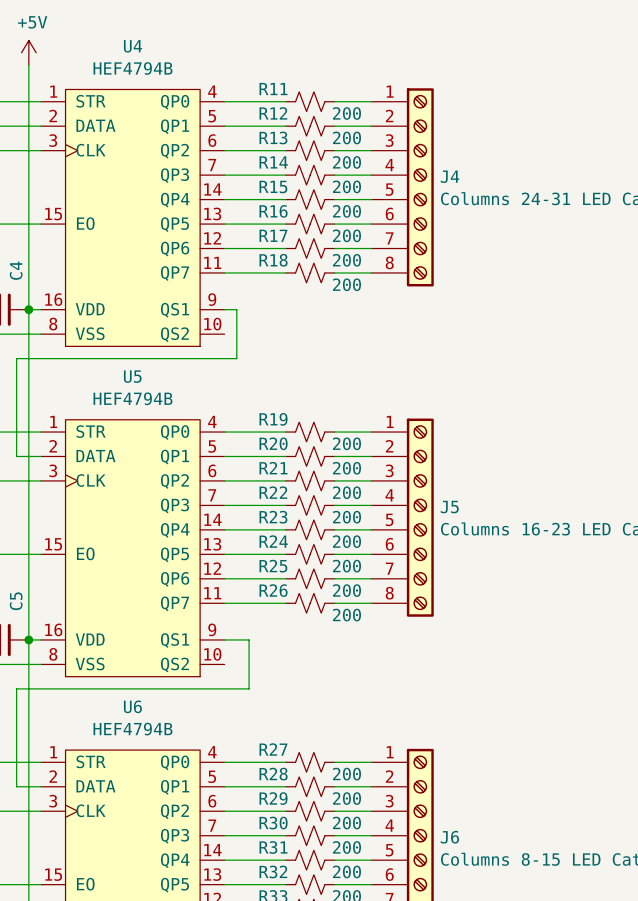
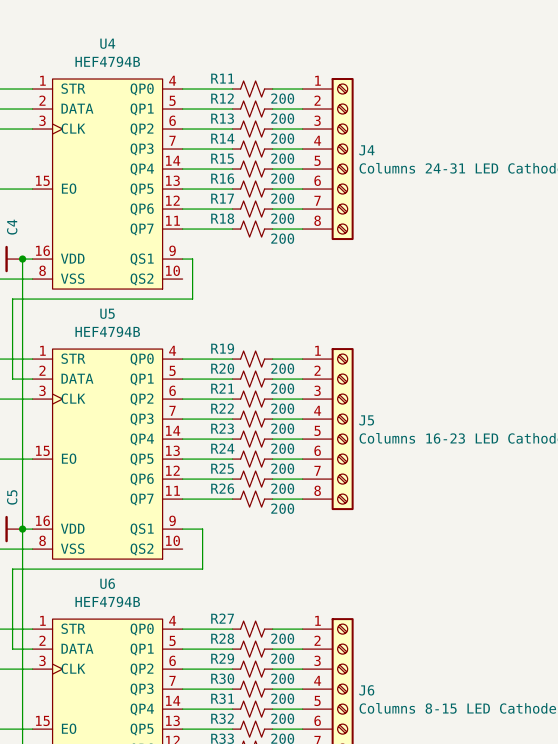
power symbol: +5V (28, 52) -> none
wire: (28, 65) (28, 309) -> none

